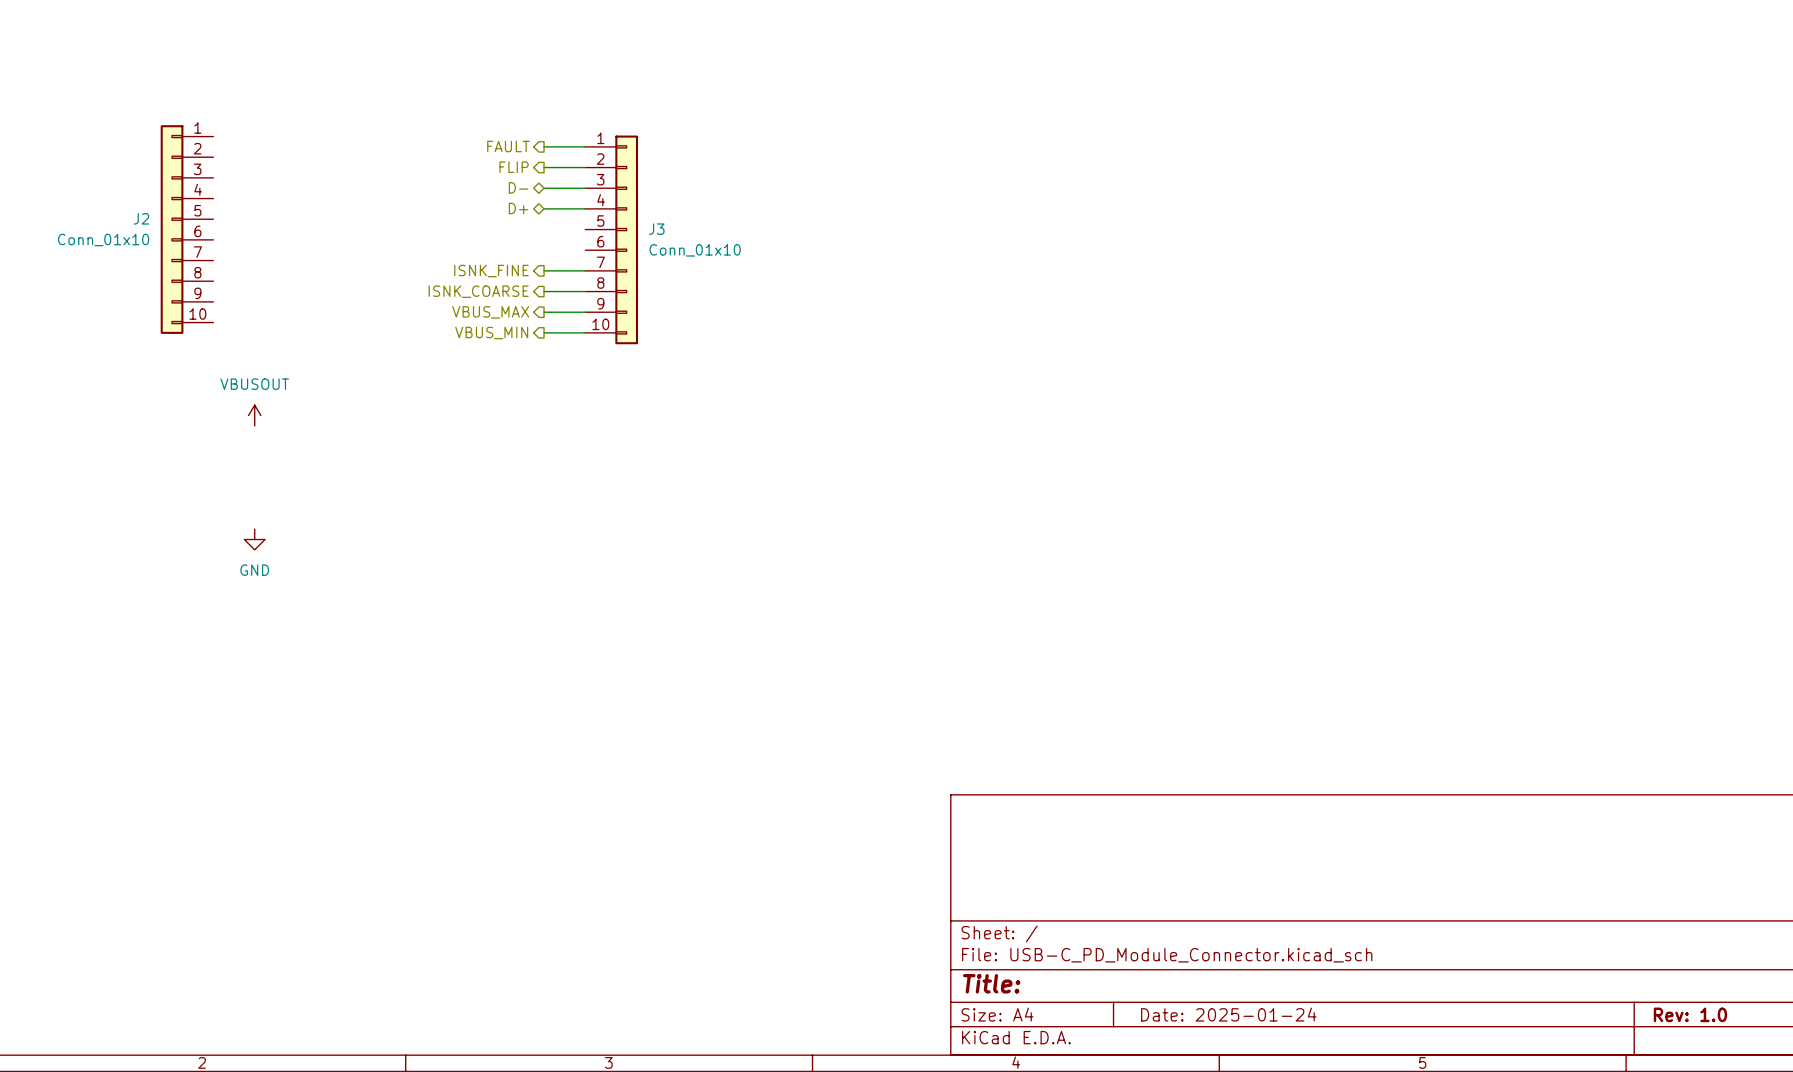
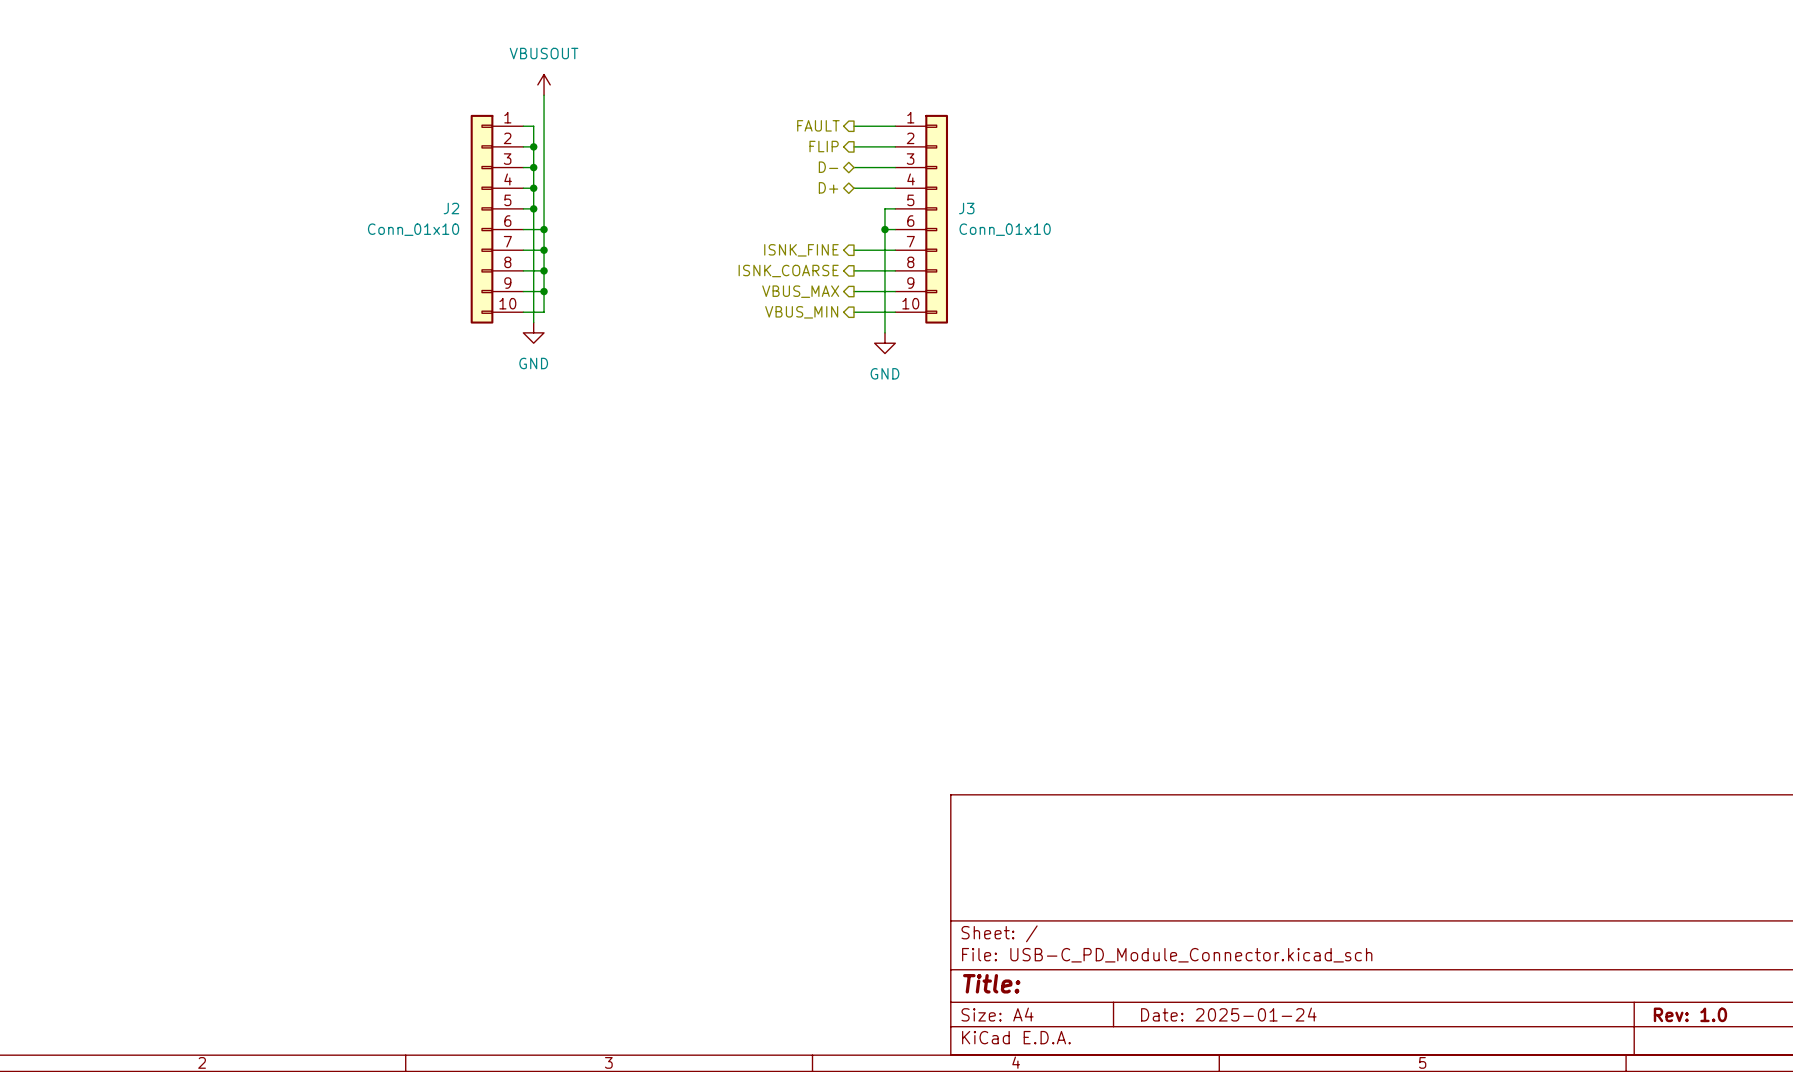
power symbol: none -> VBUSOUT (544, 84)
wire: none -> (544, 95) (544, 312) (523, 312)
hierarchical label: none -> FAULT (818, 125)
wire: none -> (523, 126) (533, 126) (533, 322)
wire: none -> (853, 126) (895, 126)
hierarchical label: FAULT (508, 146) -> none
wire: none -> (523, 146) (533, 146)
junction: none -> (533, 146)
wire: (544, 146) (585, 146) -> none
hierarchical label: none -> FLIP (824, 146)
wire: none -> (853, 146) (895, 146)
hierarchical label: FLIP (514, 167) -> none
wire: none -> (523, 167) (533, 167)
junction: none -> (533, 167)
wire: (544, 167) (585, 167) -> none
hierarchical label: none -> D- (828, 167)
wire: none -> (853, 167) (895, 167)
hierarchical label: D- (518, 187) -> none
hierarchical label: none -> D+ (828, 187)
wire: none -> (523, 188) (533, 188)
junction: none -> (533, 188)
wire: (544, 188) (585, 188) -> none
wire: none -> (853, 188) (895, 188)
hierarchical label: D+ (518, 208) -> none
wire: none -> (523, 208) (533, 208)
junction: none -> (533, 208)
wire: (544, 208) (585, 208) -> none
wire: none -> (895, 208) (884, 208) (884, 332)
J2 position: (187, 229) -> (497, 219)
wire: none -> (523, 229) (544, 229)
junction: none -> (544, 229)
wire: none -> (884, 229) (895, 229)
junction: none -> (884, 229)
J3 position: (611, 239) -> (921, 219)
wire: none -> (523, 250) (544, 250)
junction: none -> (544, 250)
hierarchical label: none -> ISNK_FINE (801, 250)
wire: none -> (853, 250) (895, 250)
hierarchical label: ISNK_FINE (491, 270) -> none
wire: (544, 270) (585, 270) -> (544, 270) (523, 270)
junction: none -> (544, 270)
hierarchical label: none -> ISNK_COARSE (788, 270)
wire: none -> (853, 270) (895, 270)
hierarchical label: ISNK_COARSE (478, 291) -> none
wire: (544, 291) (585, 291) -> (544, 291) (523, 291)
junction: none -> (544, 291)
hierarchical label: none -> VBUS_MAX (800, 291)
wire: none -> (853, 291) (895, 291)
hierarchical label: VBUS_MAX (490, 312) -> none
wire: (544, 312) (585, 312) -> none
hierarchical label: none -> VBUS_MIN (801, 312)
wire: none -> (853, 312) (895, 312)
hierarchical label: VBUS_MIN (491, 332) -> none
power symbol: none -> GND (533, 332)
wire: (544, 332) (585, 332) -> none
power symbol: none -> GND (884, 343)
power symbol: VBUSOUT (254, 415) -> none
power symbol: GND (254, 539) -> none

